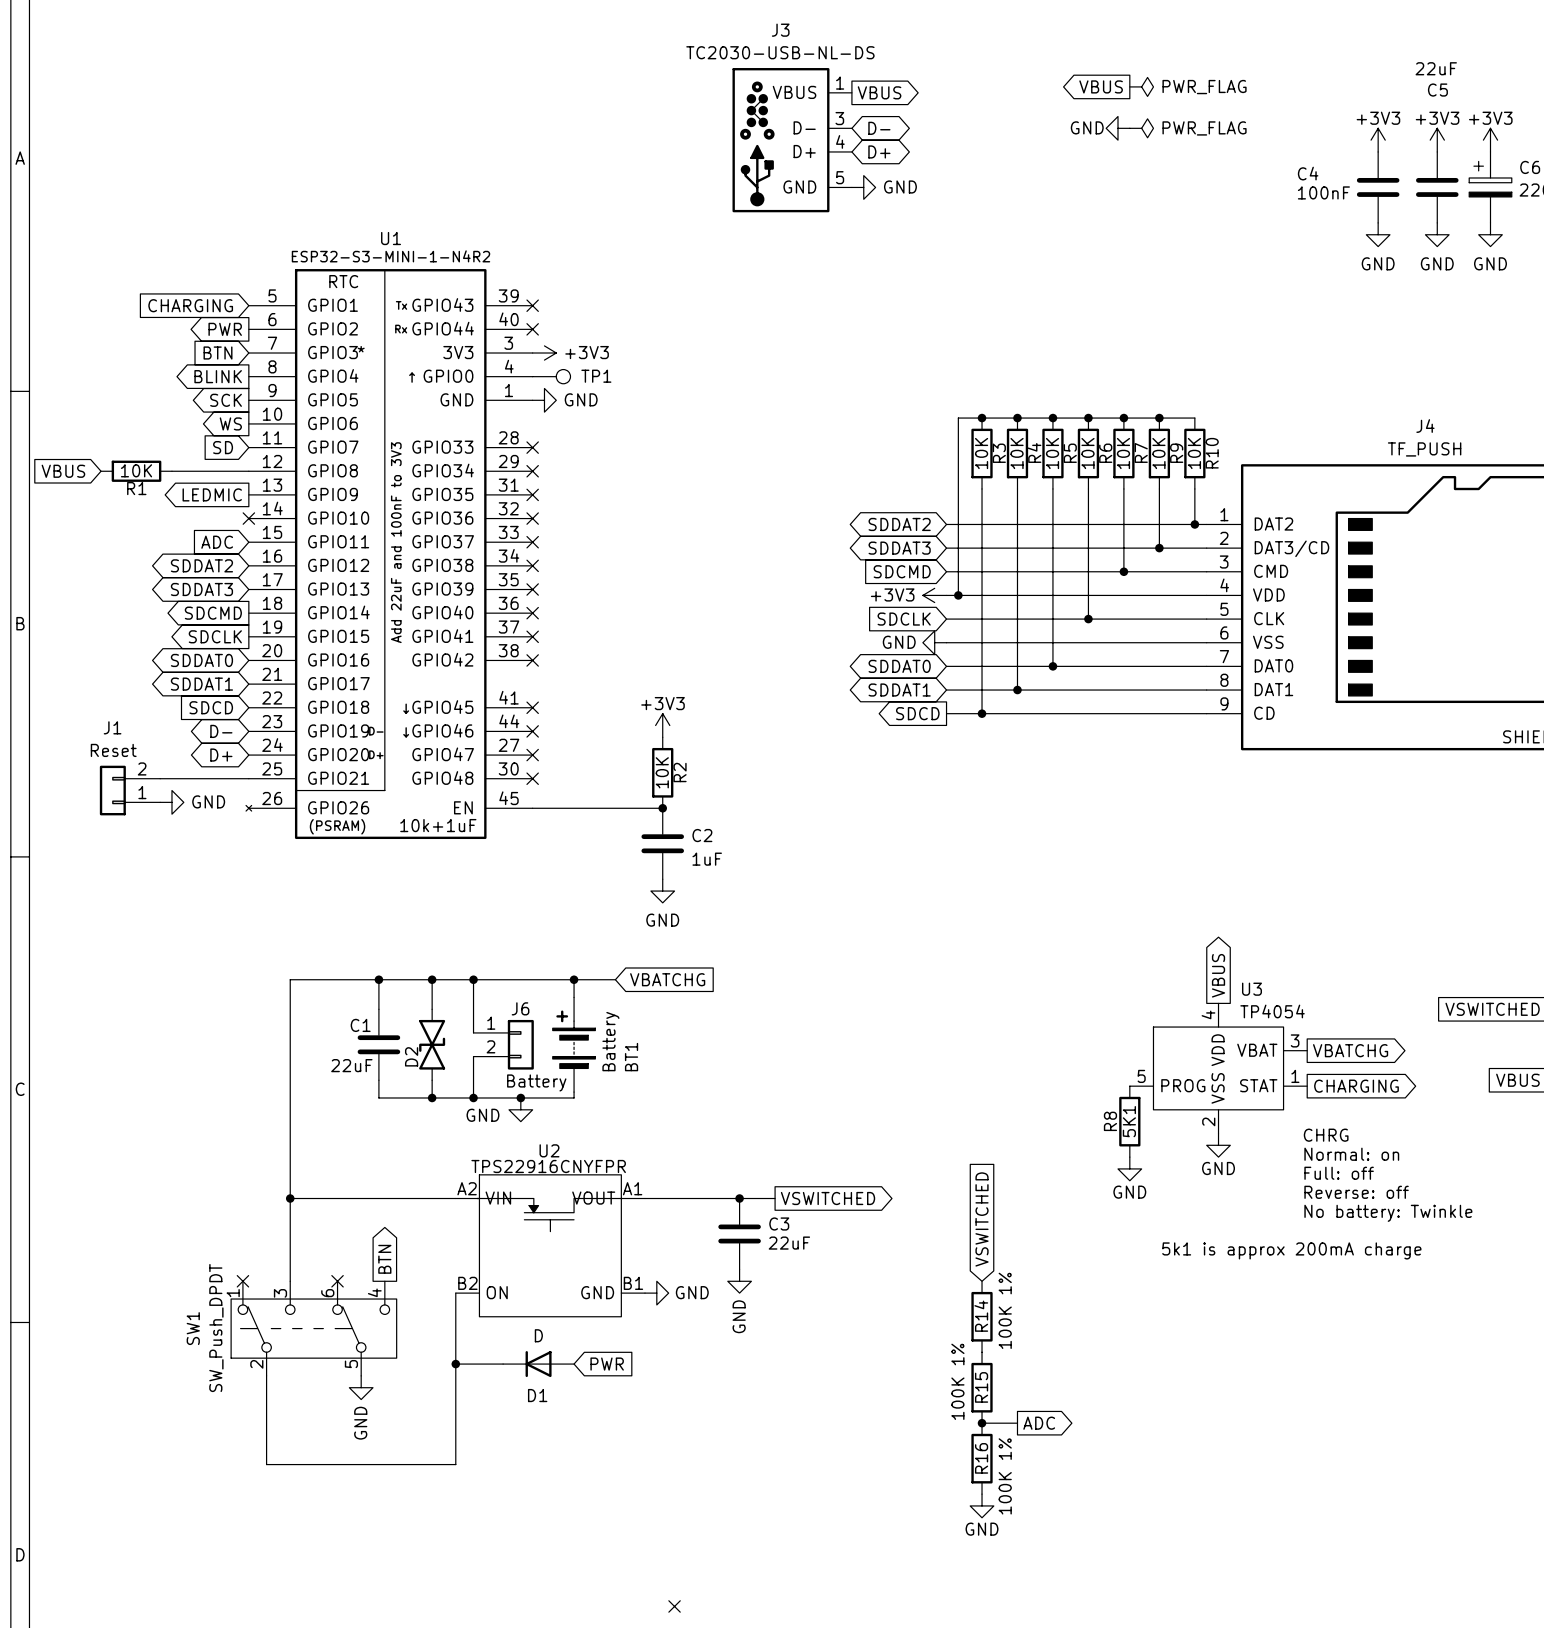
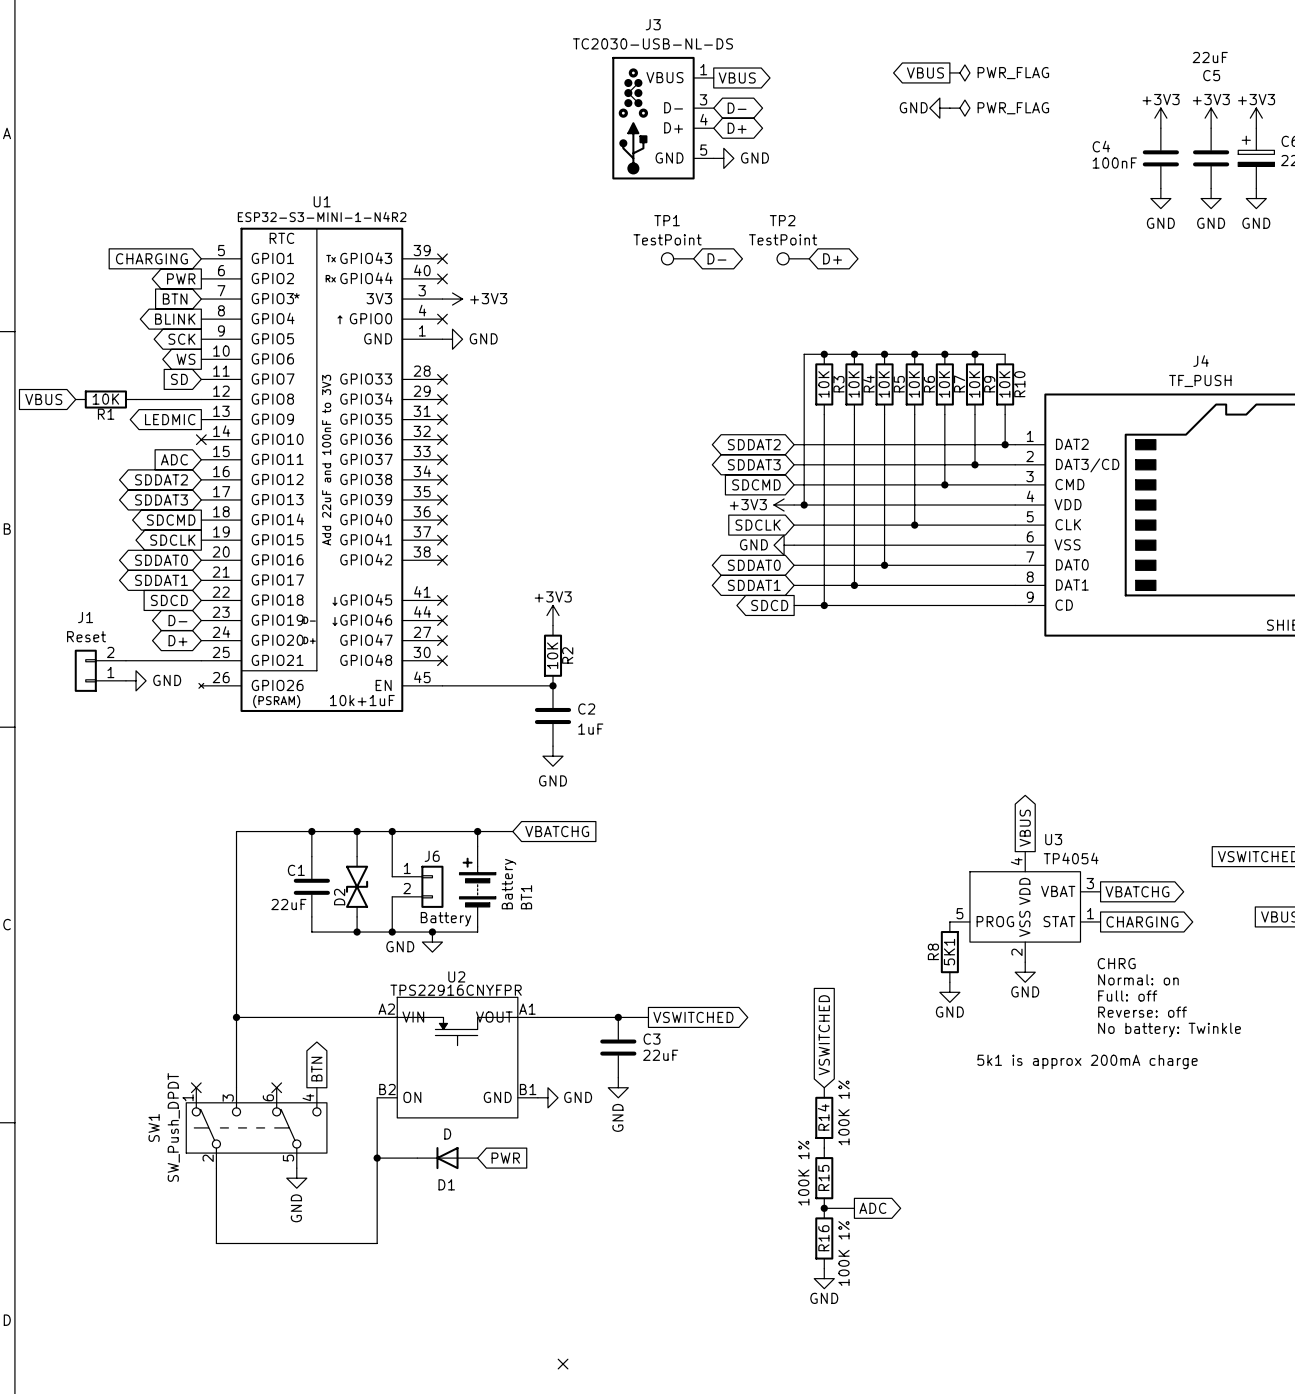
TP1 value: none -> TestPoint (667, 239)
global label: none -> D- (717, 258)
TP2: none -> TestPoint (793, 258)
global label: none -> D+ (832, 258)
no-connect mark: none -> (442, 319)
TP1 position: (551, 376) -> (677, 258)
TP1 rotation: 0° (563, 376) -> 180° (667, 258)
TP1 name position: TP1 (596, 376) -> TP1 (667, 220)

